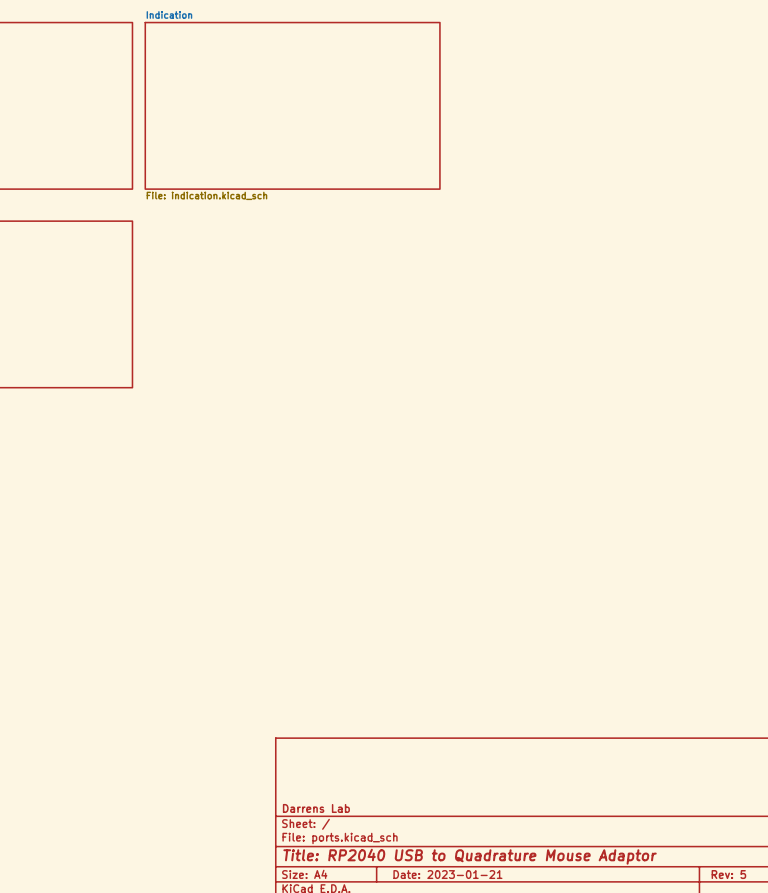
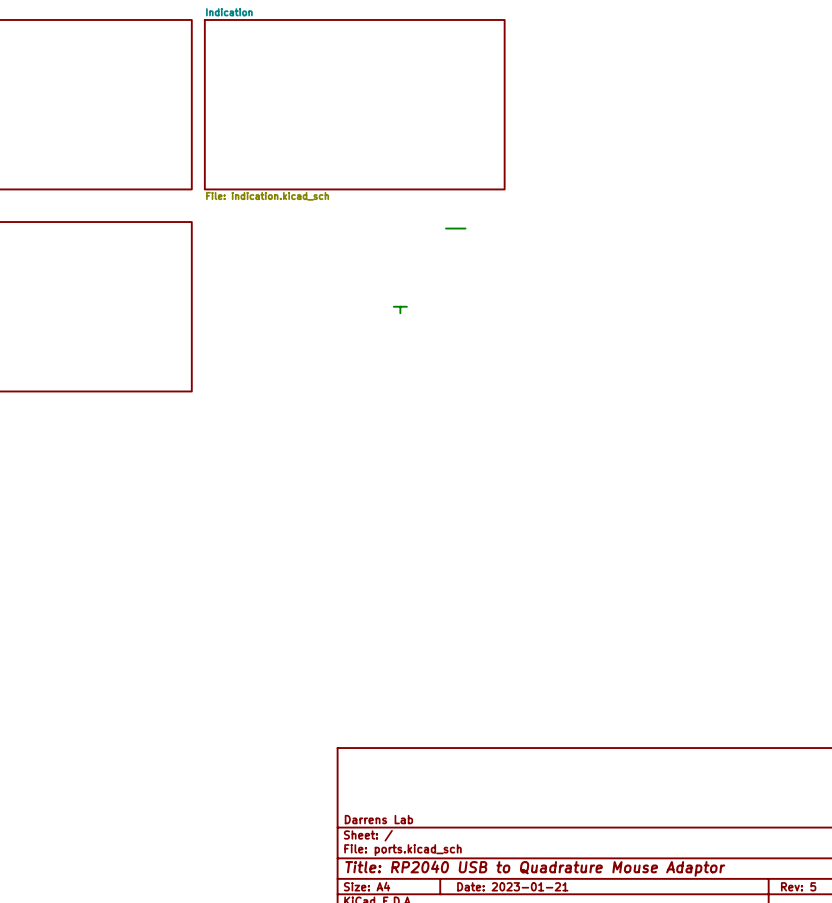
wire: none -> (445, 228) (465, 228)
wire: none -> (393, 306) (406, 306)
wire: none -> (400, 306) (400, 313)

